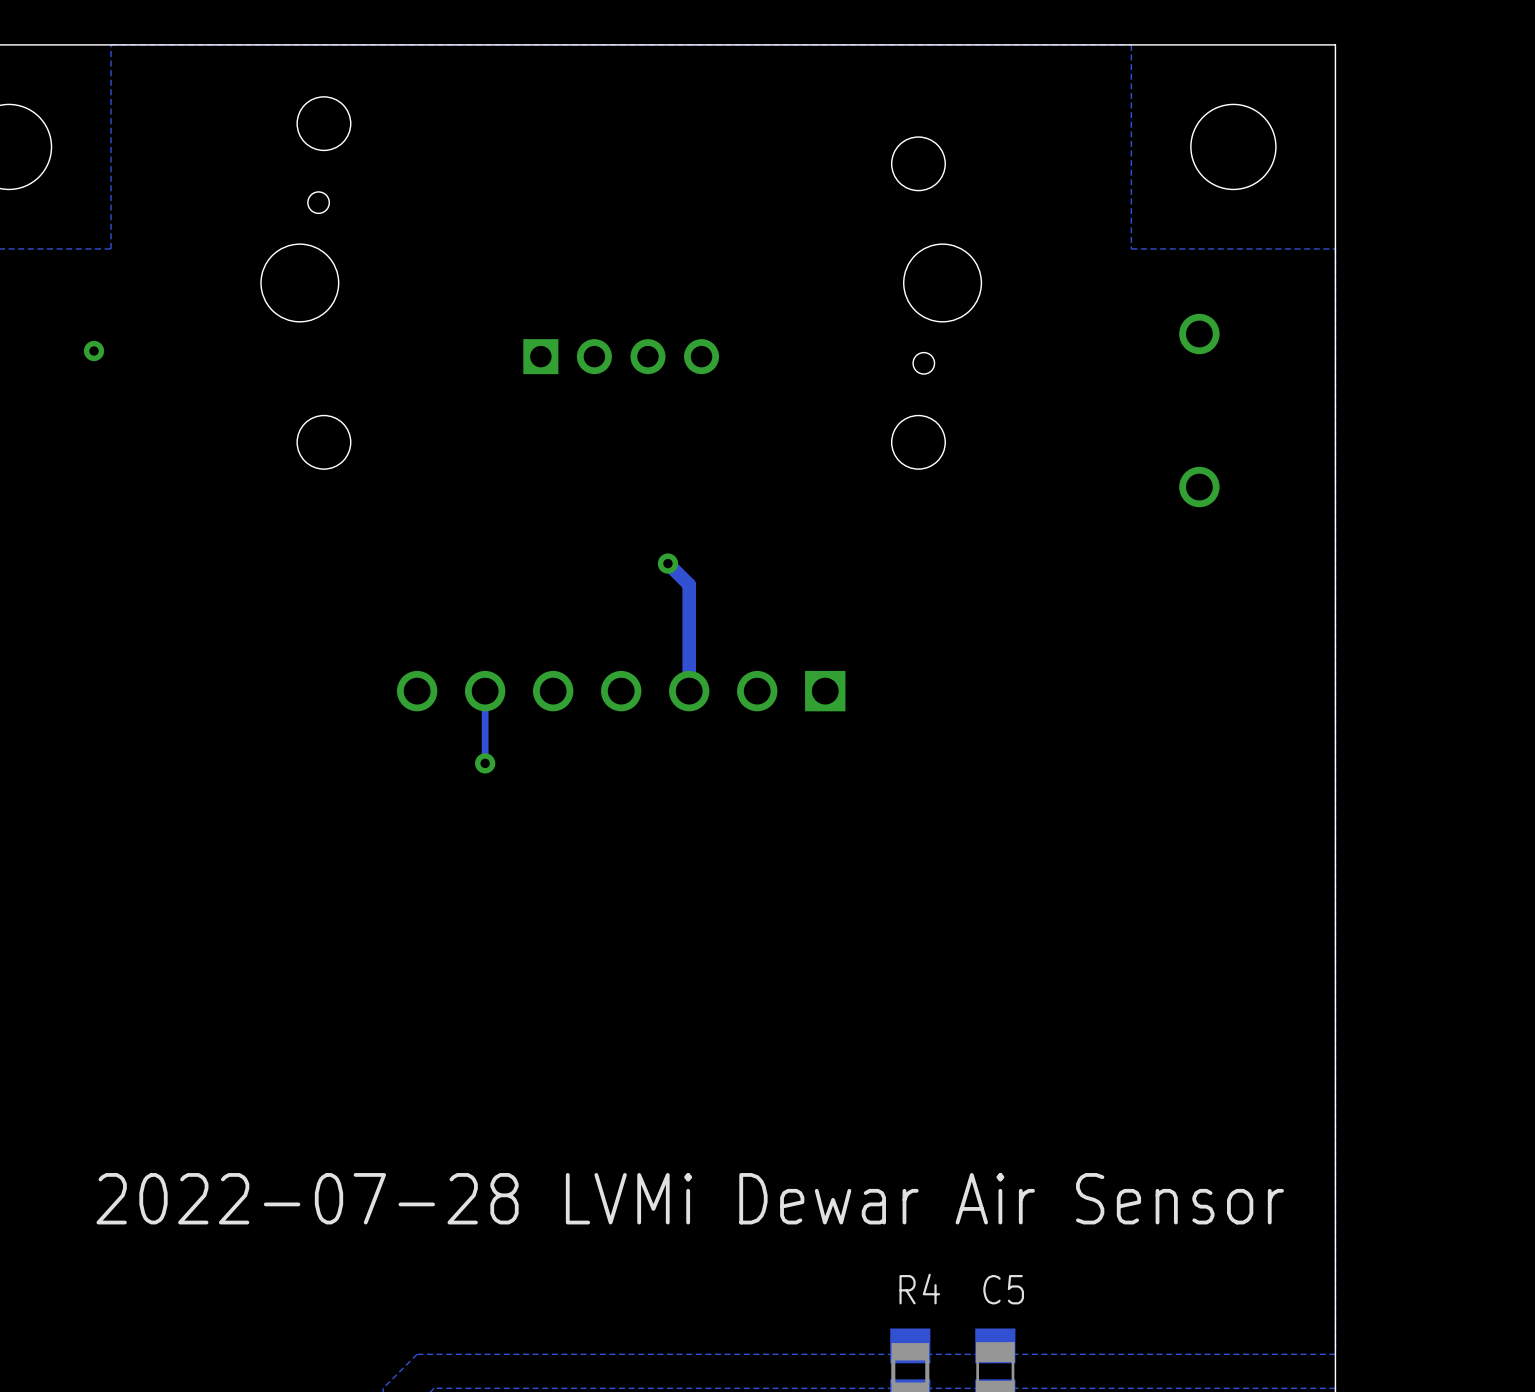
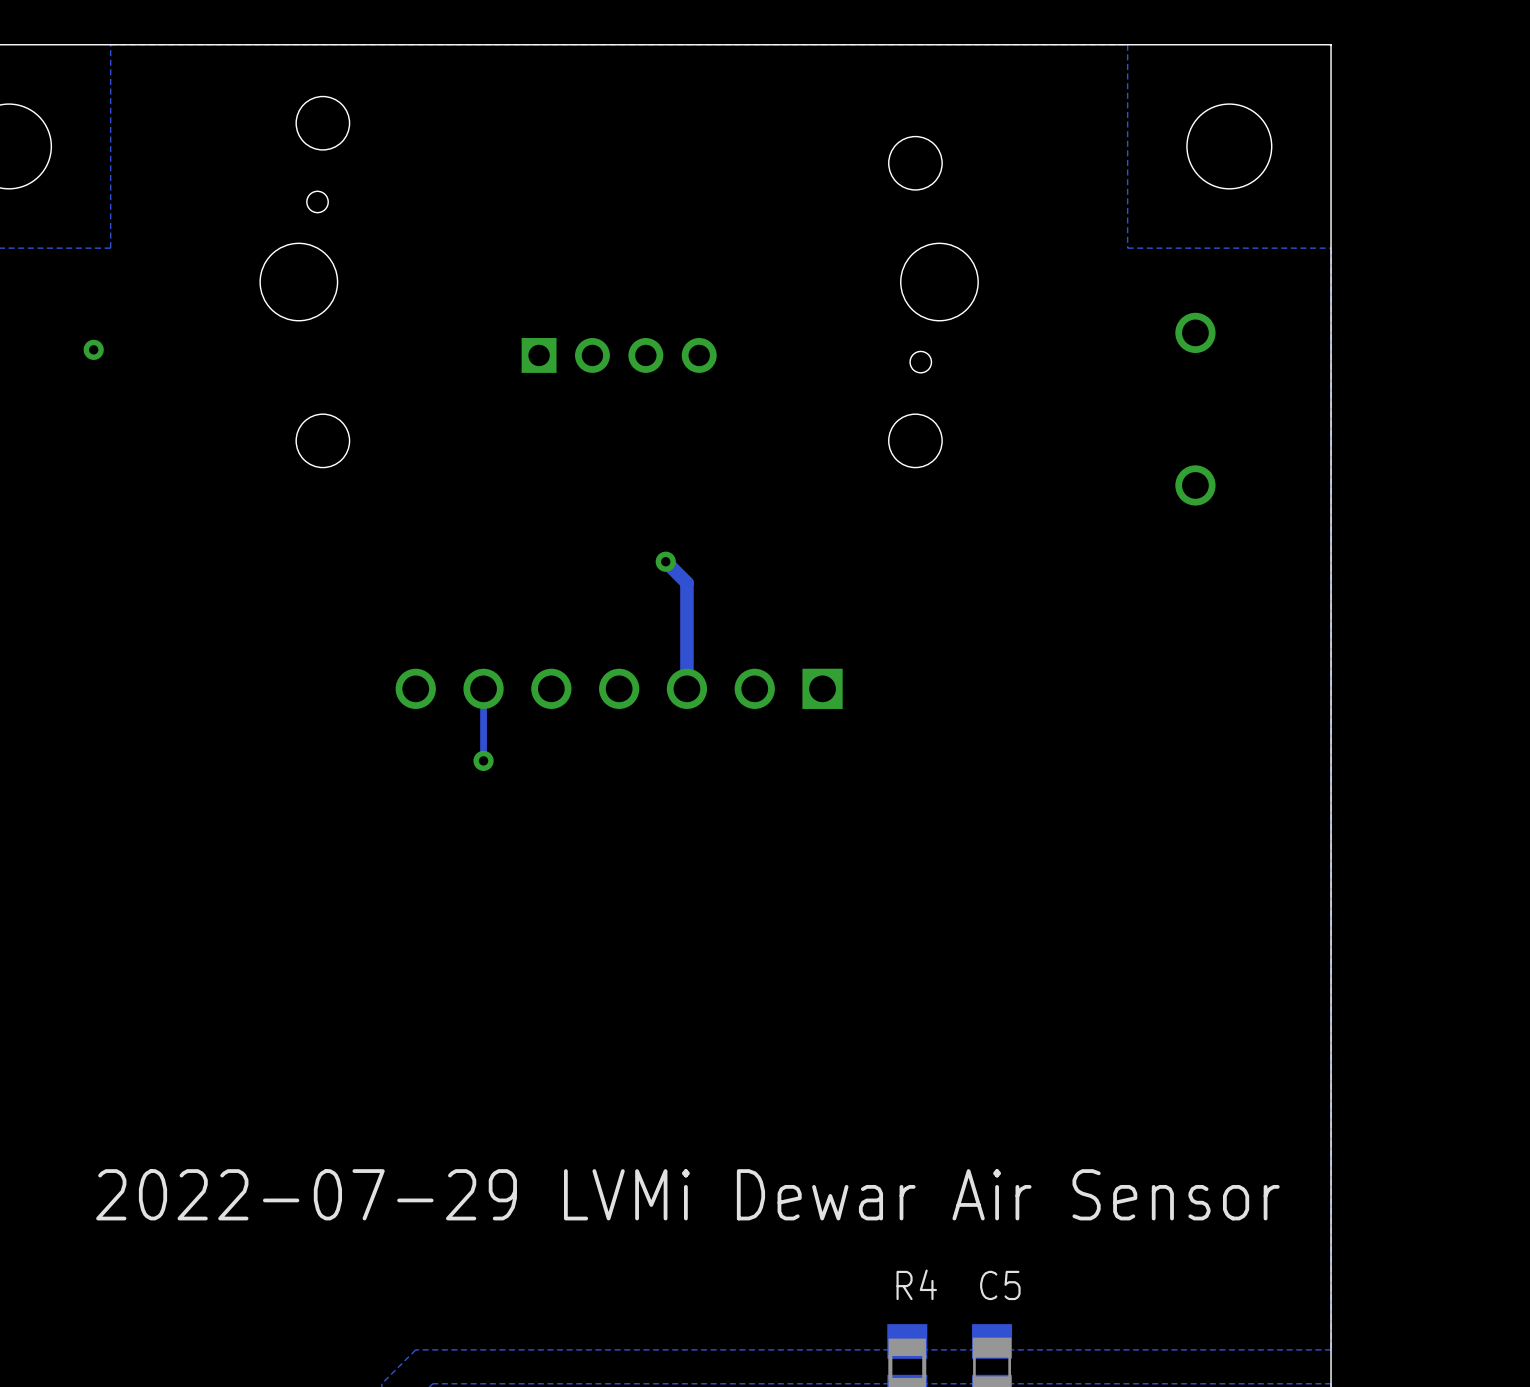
text: 2022-07-28 LVMi Dewar Air Sensor (690, 1198) -> 2022-07-29 LVMi Dewar Air Sensor (687, 1194)

